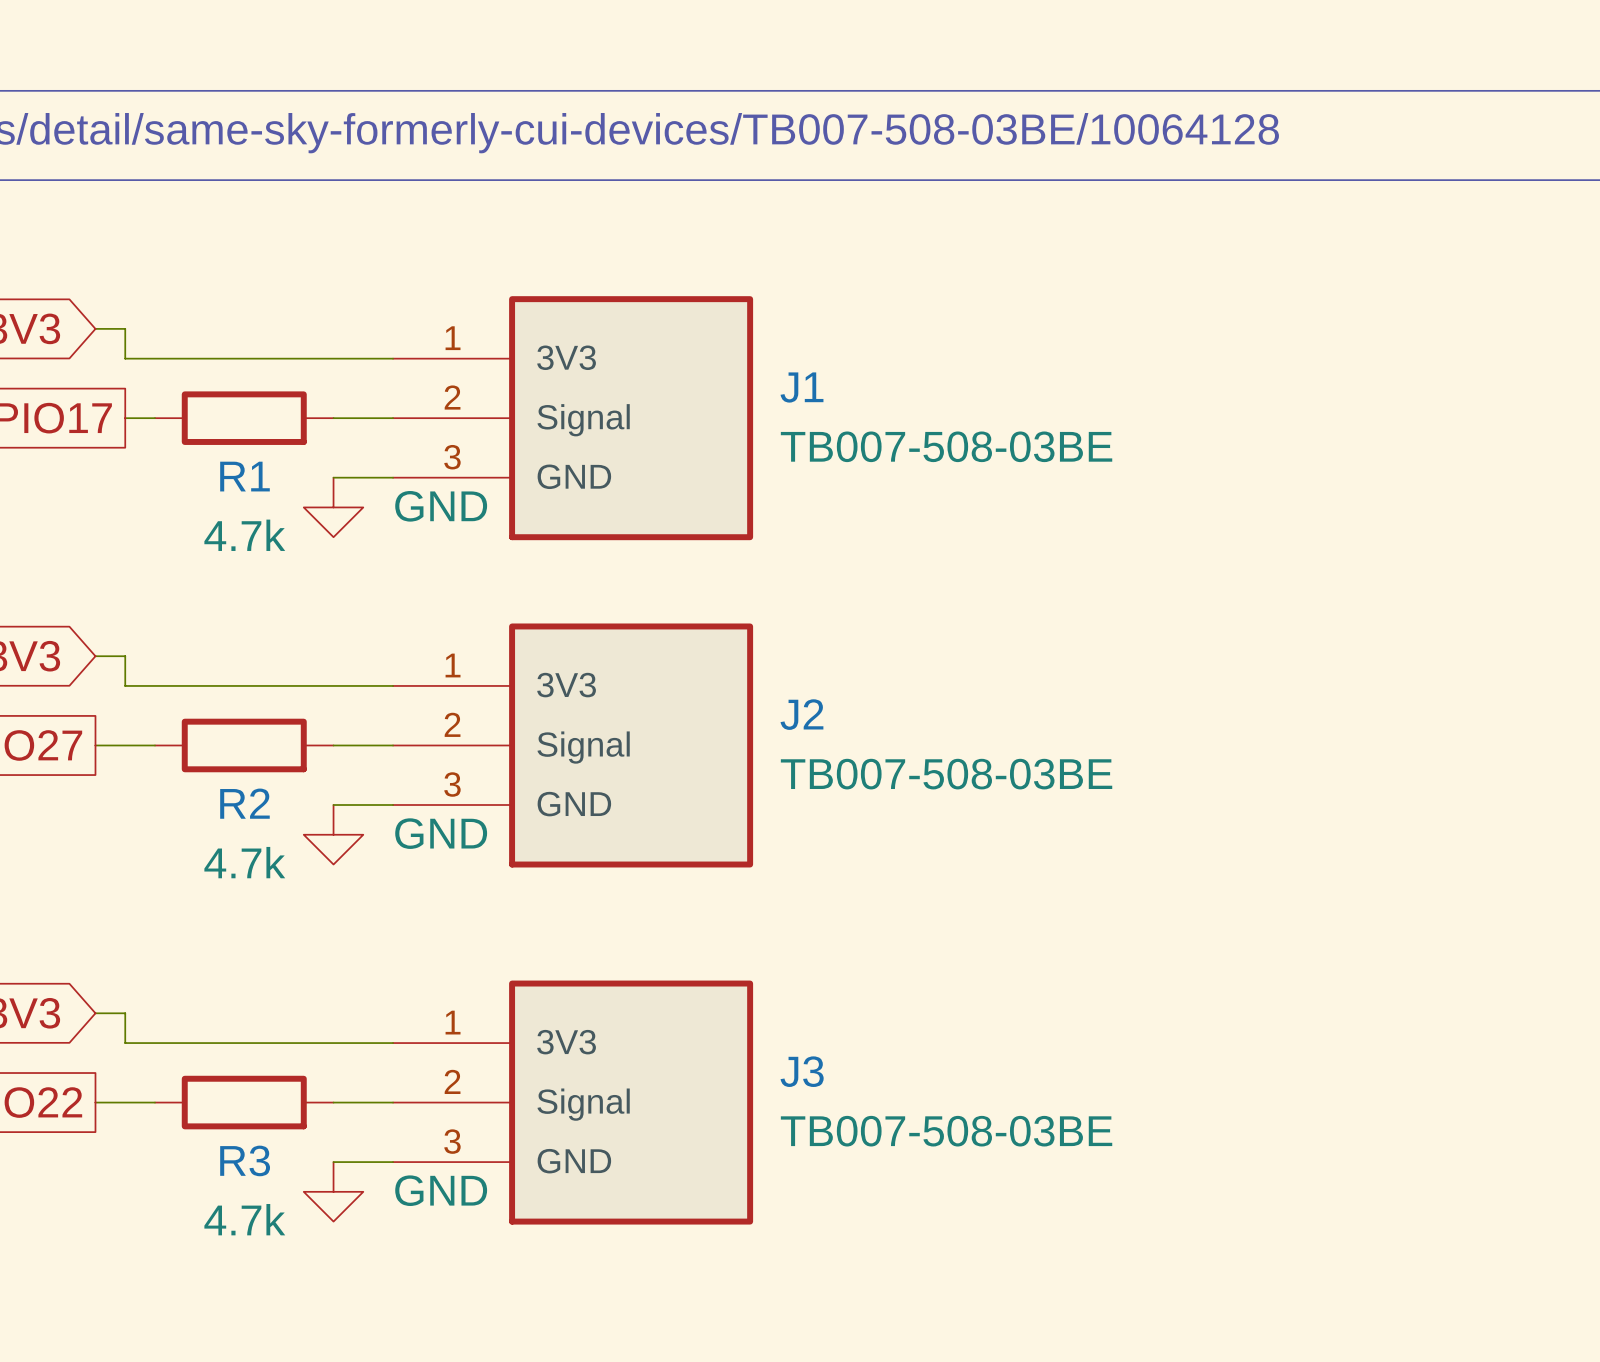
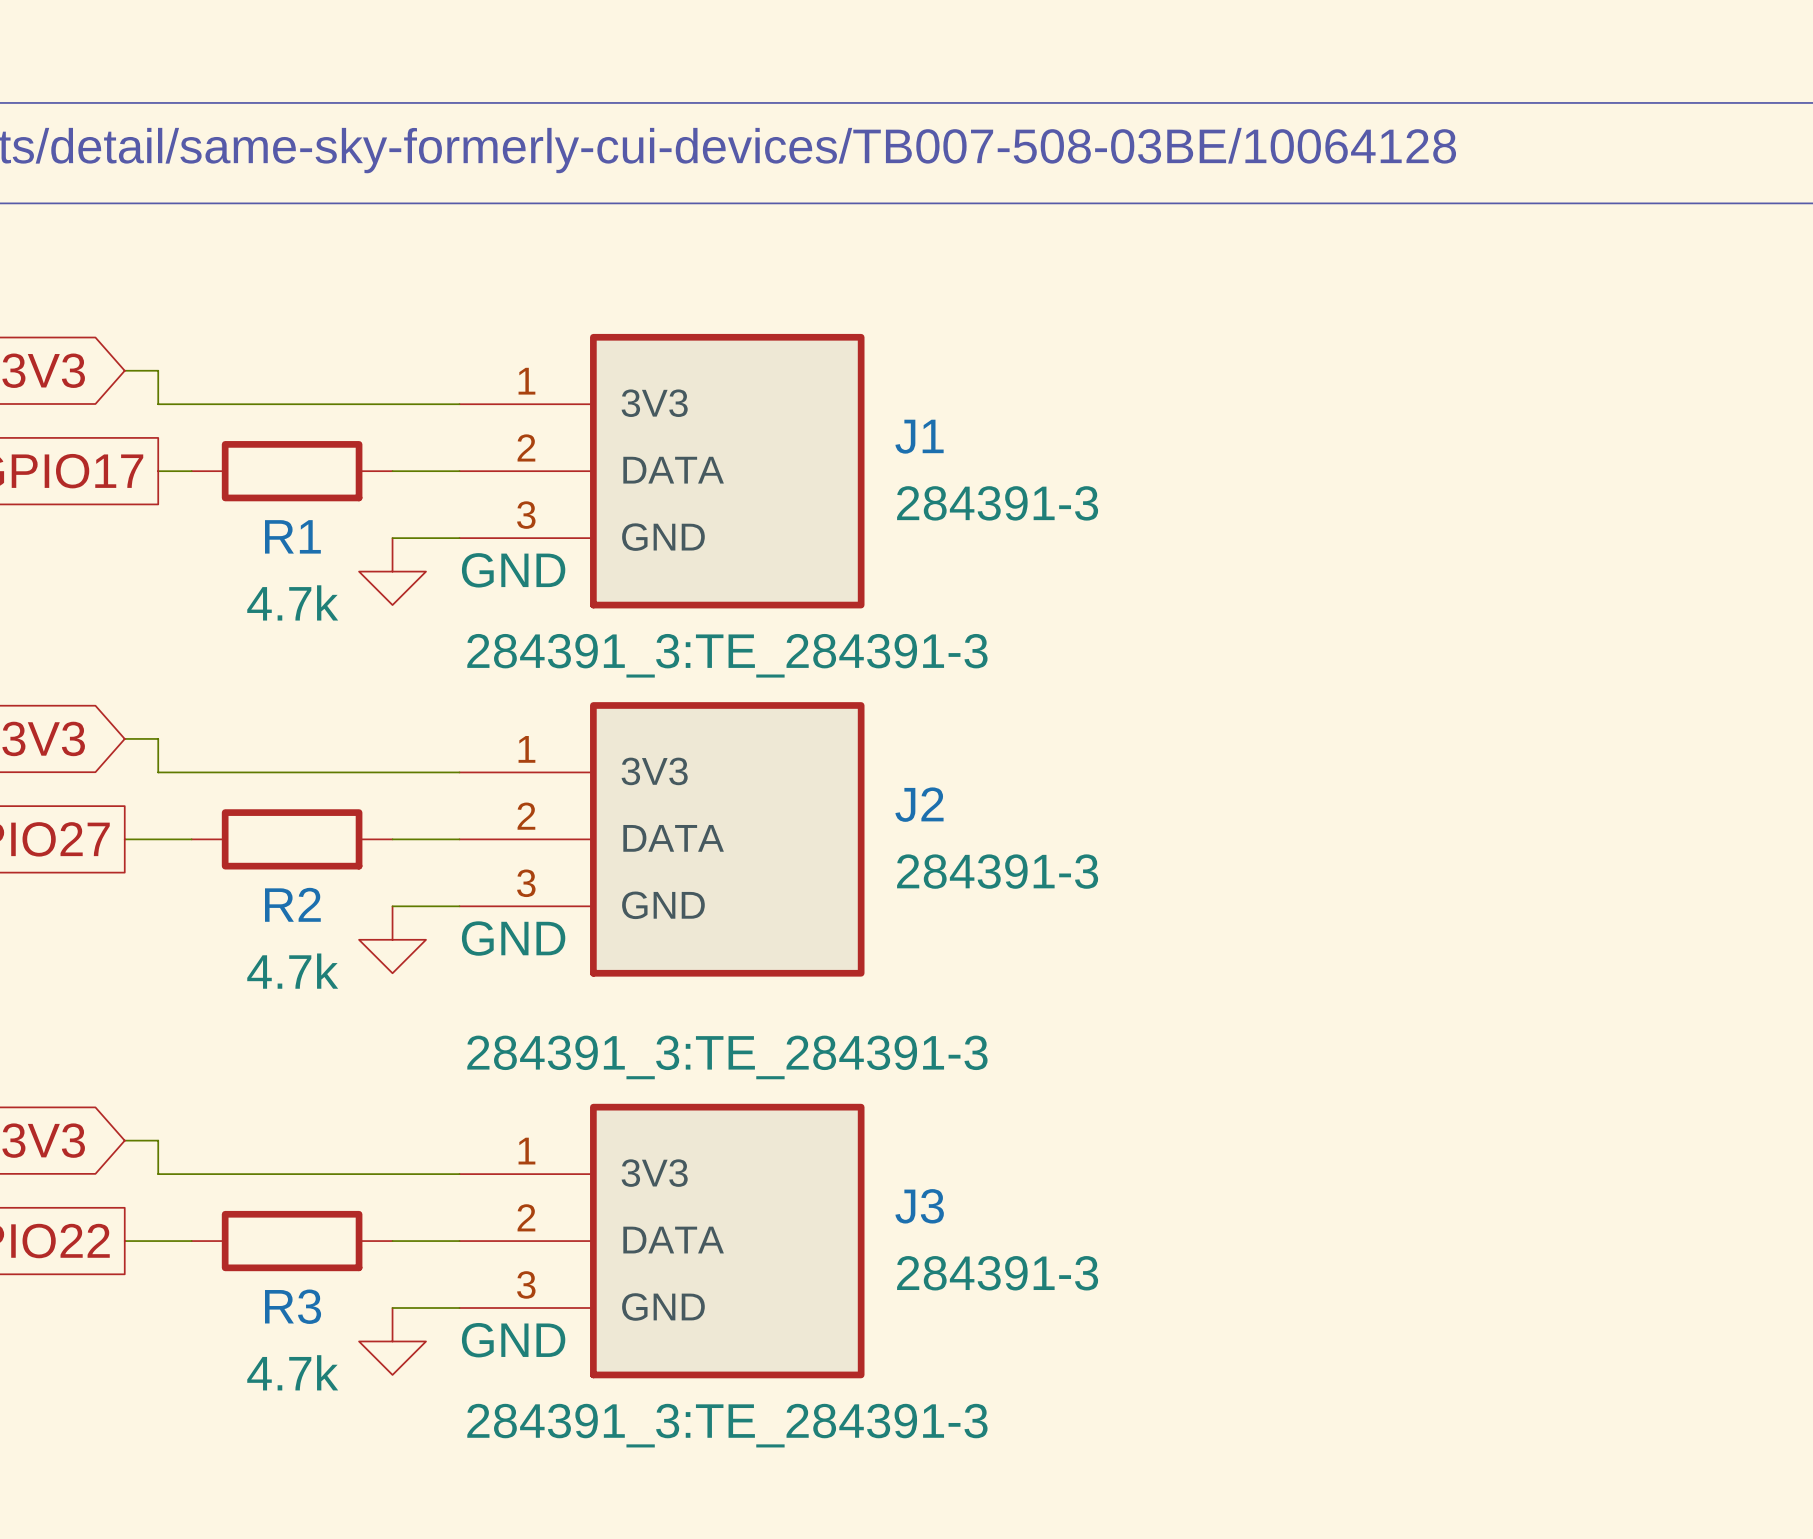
J1 pin name: Signal (583, 420) -> DATA (673, 470)
J1 value: TB007-508-03BE (946, 446) -> 284391-3 (997, 503)
J1 text: none -> 284391_3:TE_284391-3 (727, 655)
J2 pin name: Signal (583, 747) -> DATA (673, 838)
J2 value: TB007-508-03BE (946, 774) -> 284391-3 (997, 871)
J2 text: none -> 284391_3:TE_284391-3 (727, 1057)
J3 pin name: Signal (583, 1104) -> DATA (673, 1240)
J3 value: TB007-508-03BE (946, 1131) -> 284391-3 (997, 1273)
J3 text: none -> 284391_3:TE_284391-3 (727, 1425)

